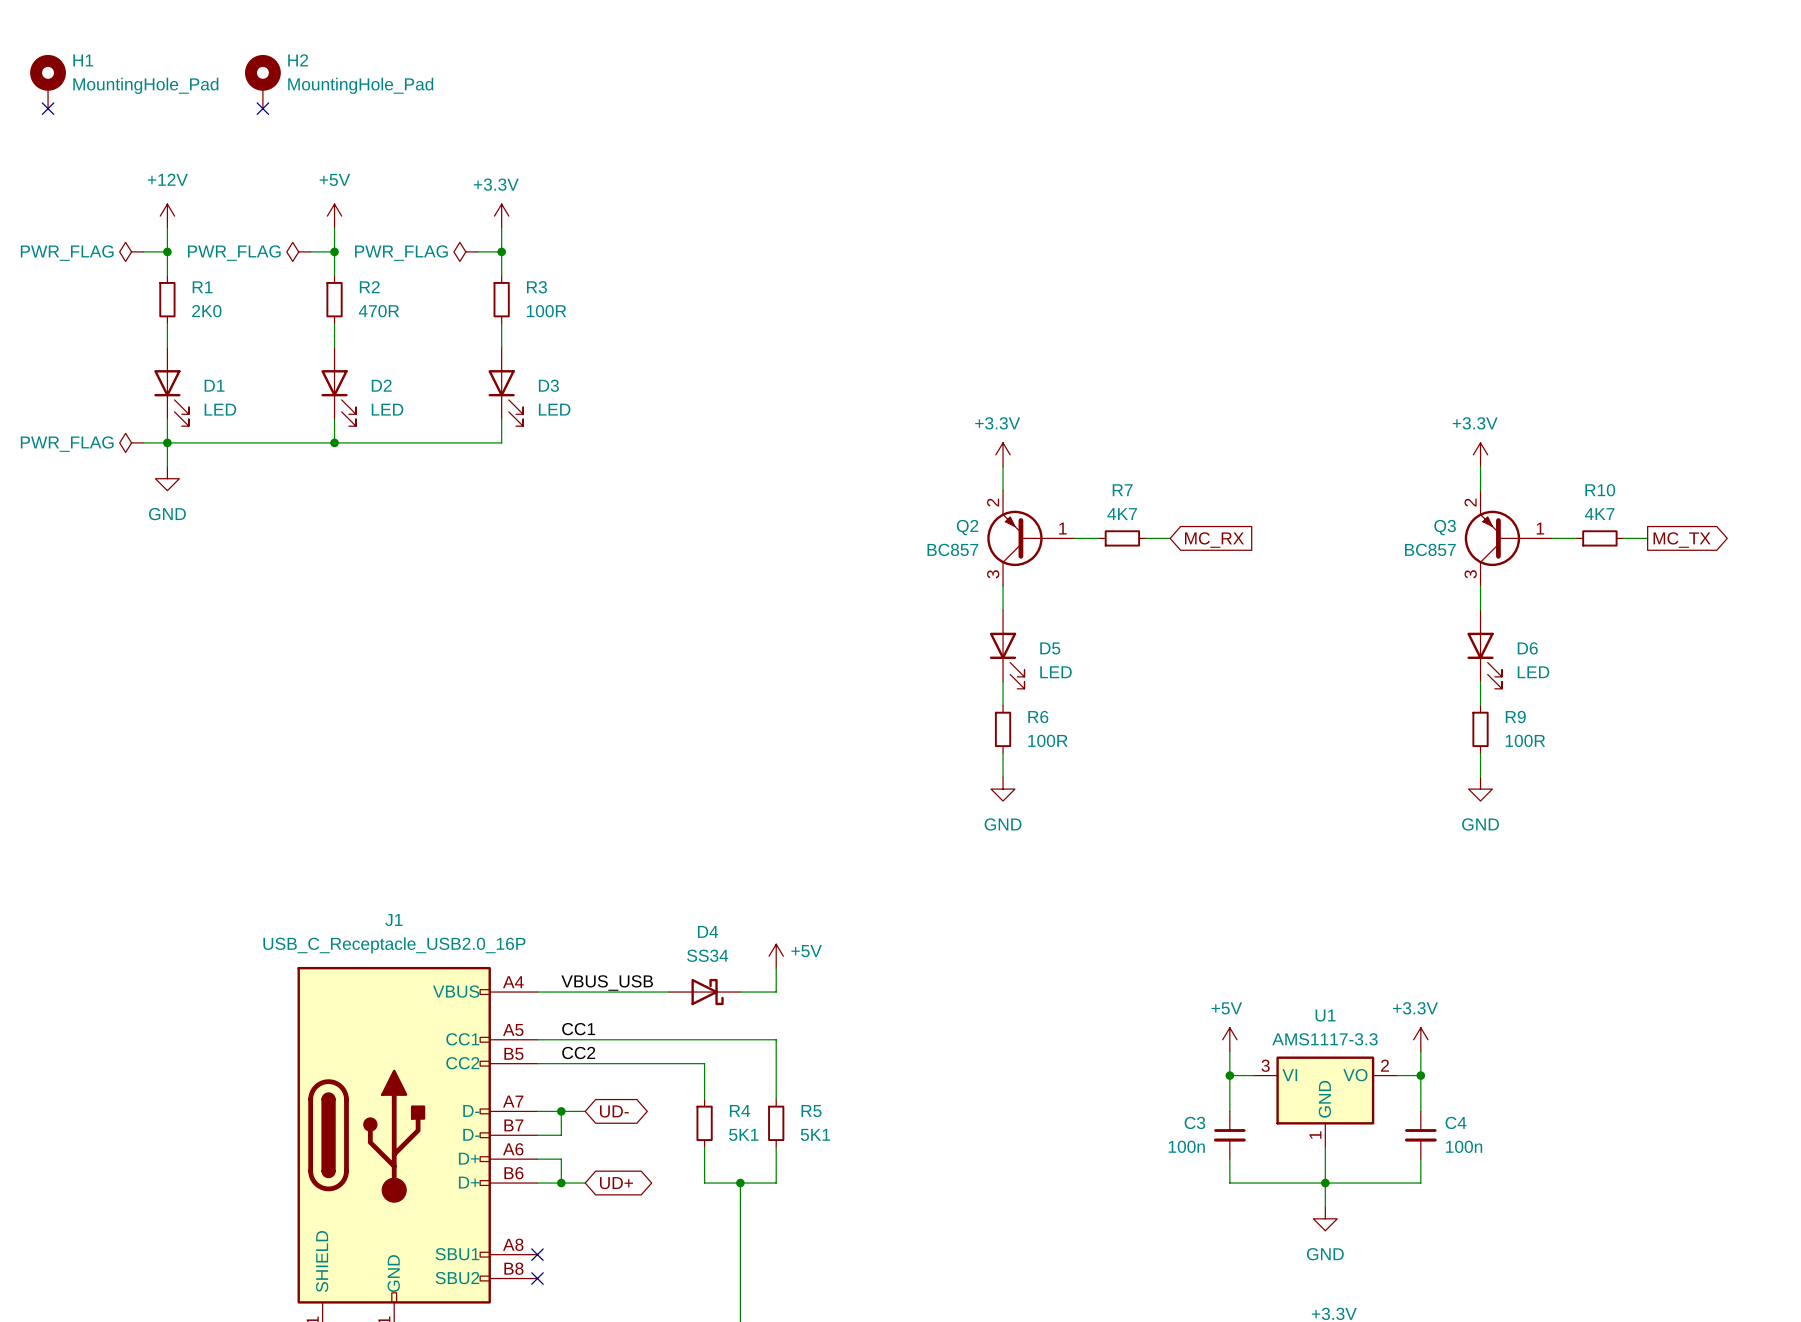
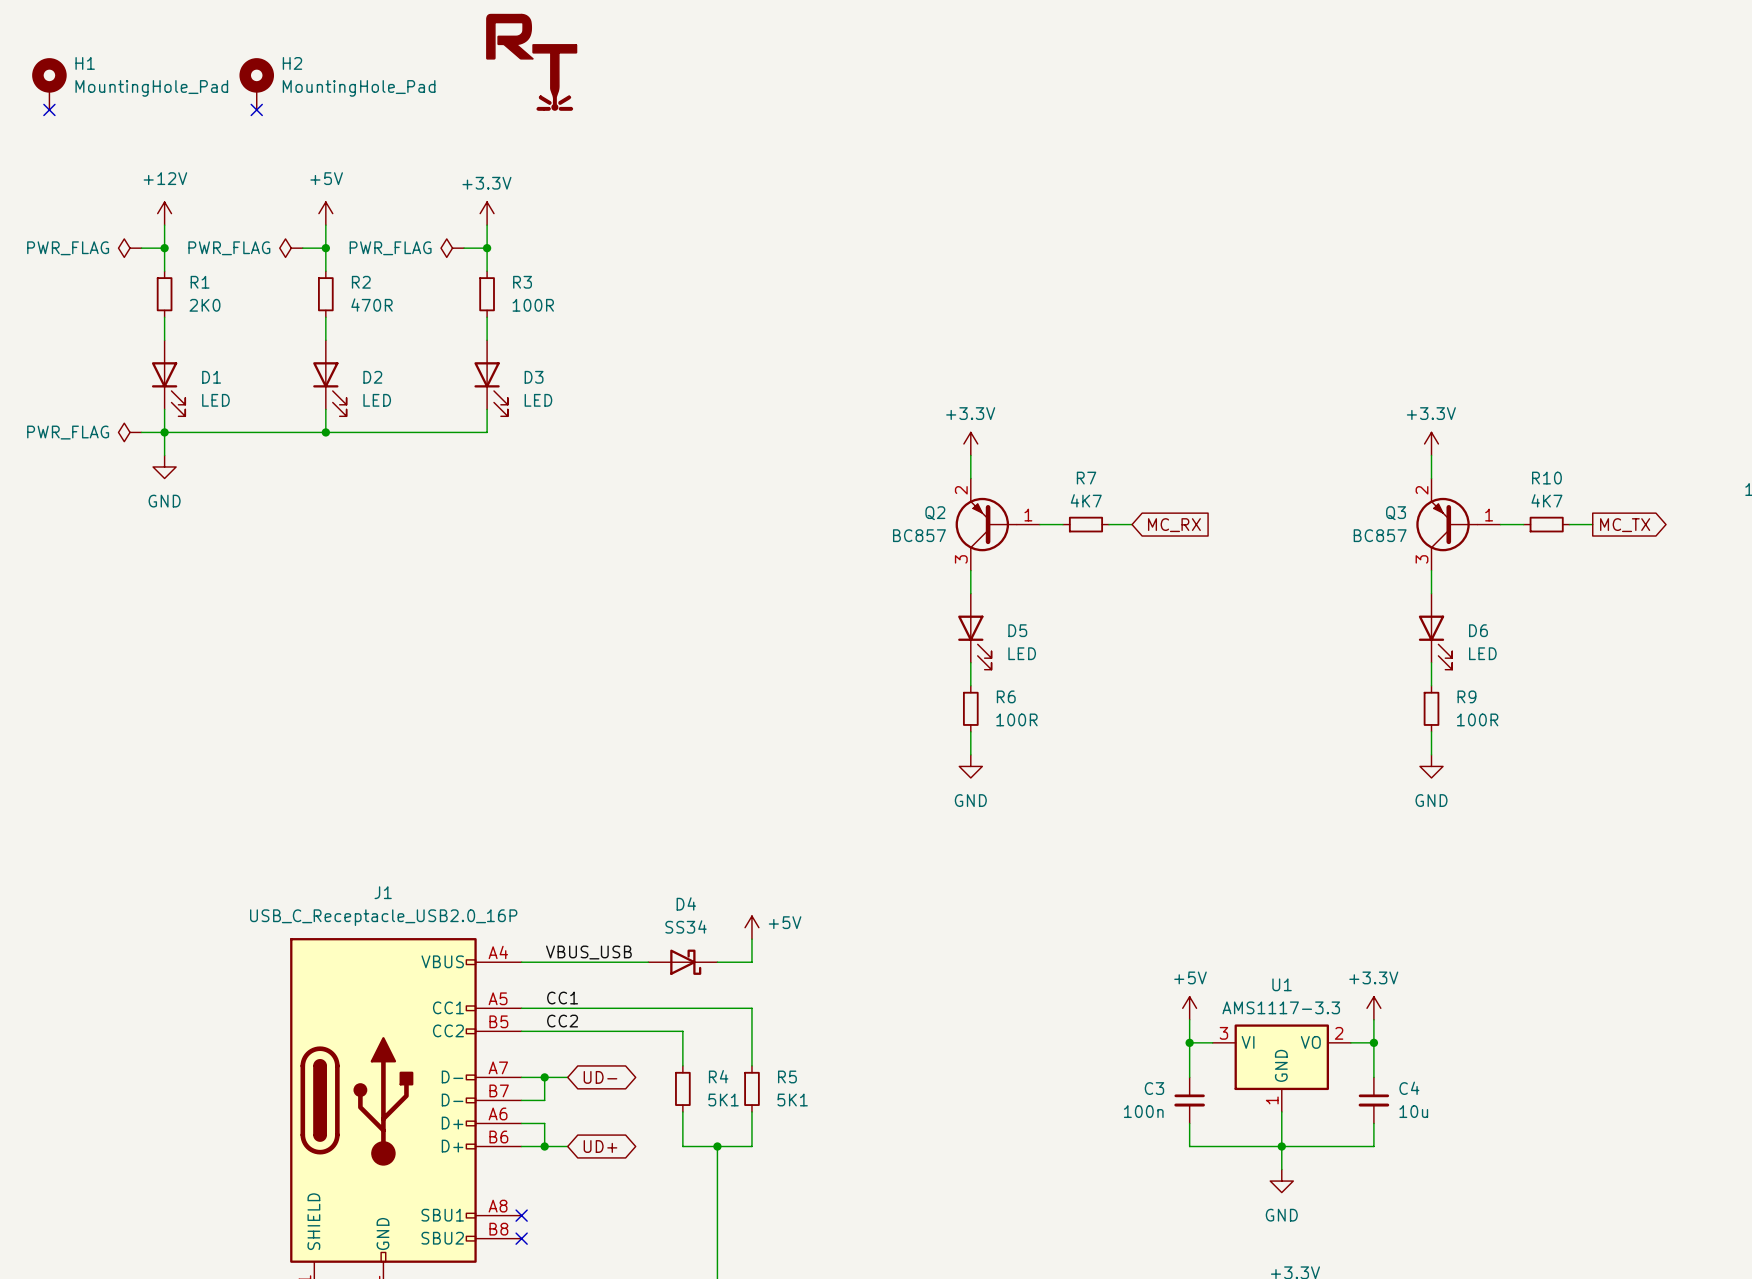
part: none -> (531, 62)
C4 value: 100n (1464, 1146) -> 10u (1413, 1111)

